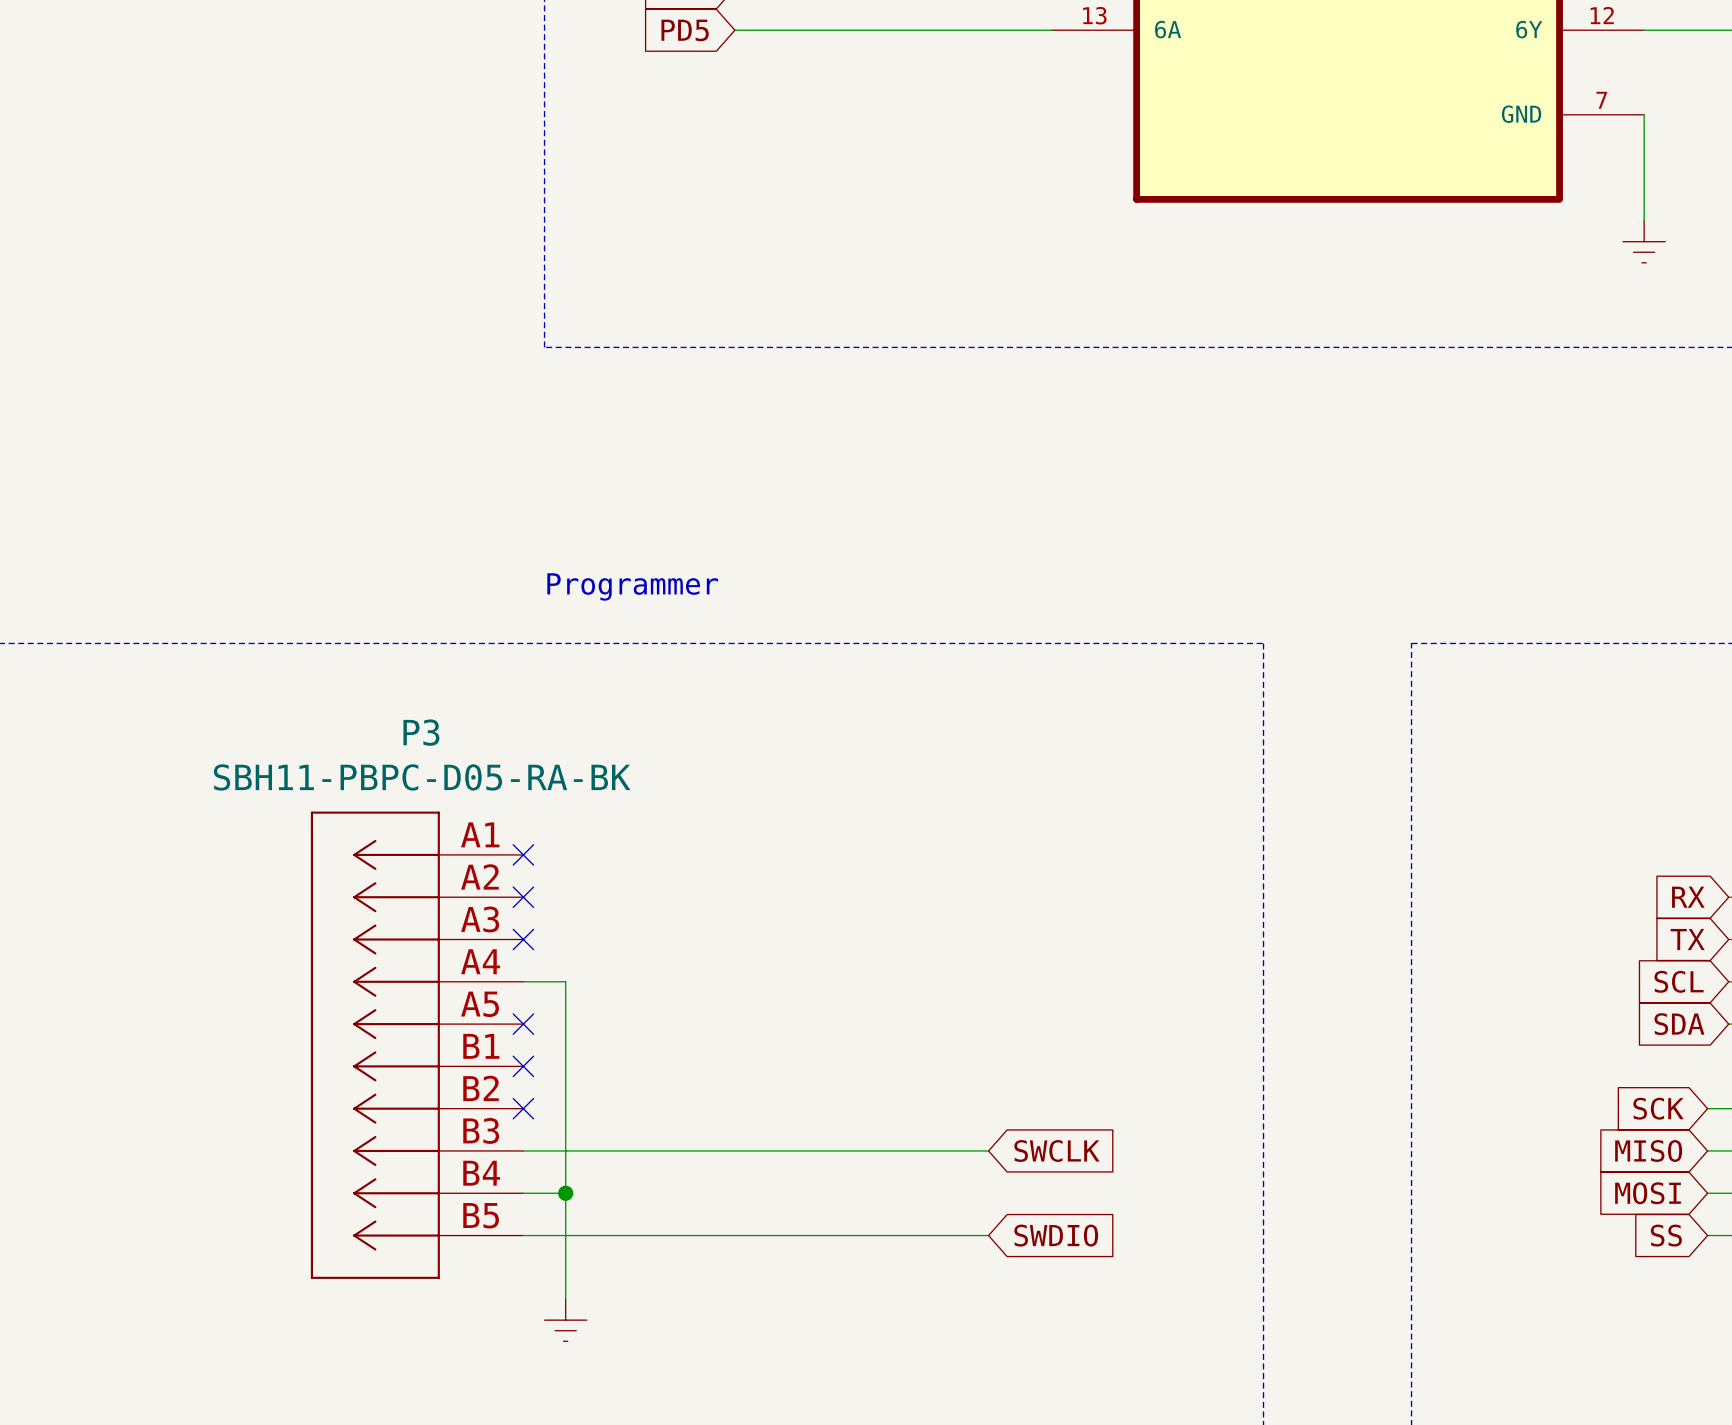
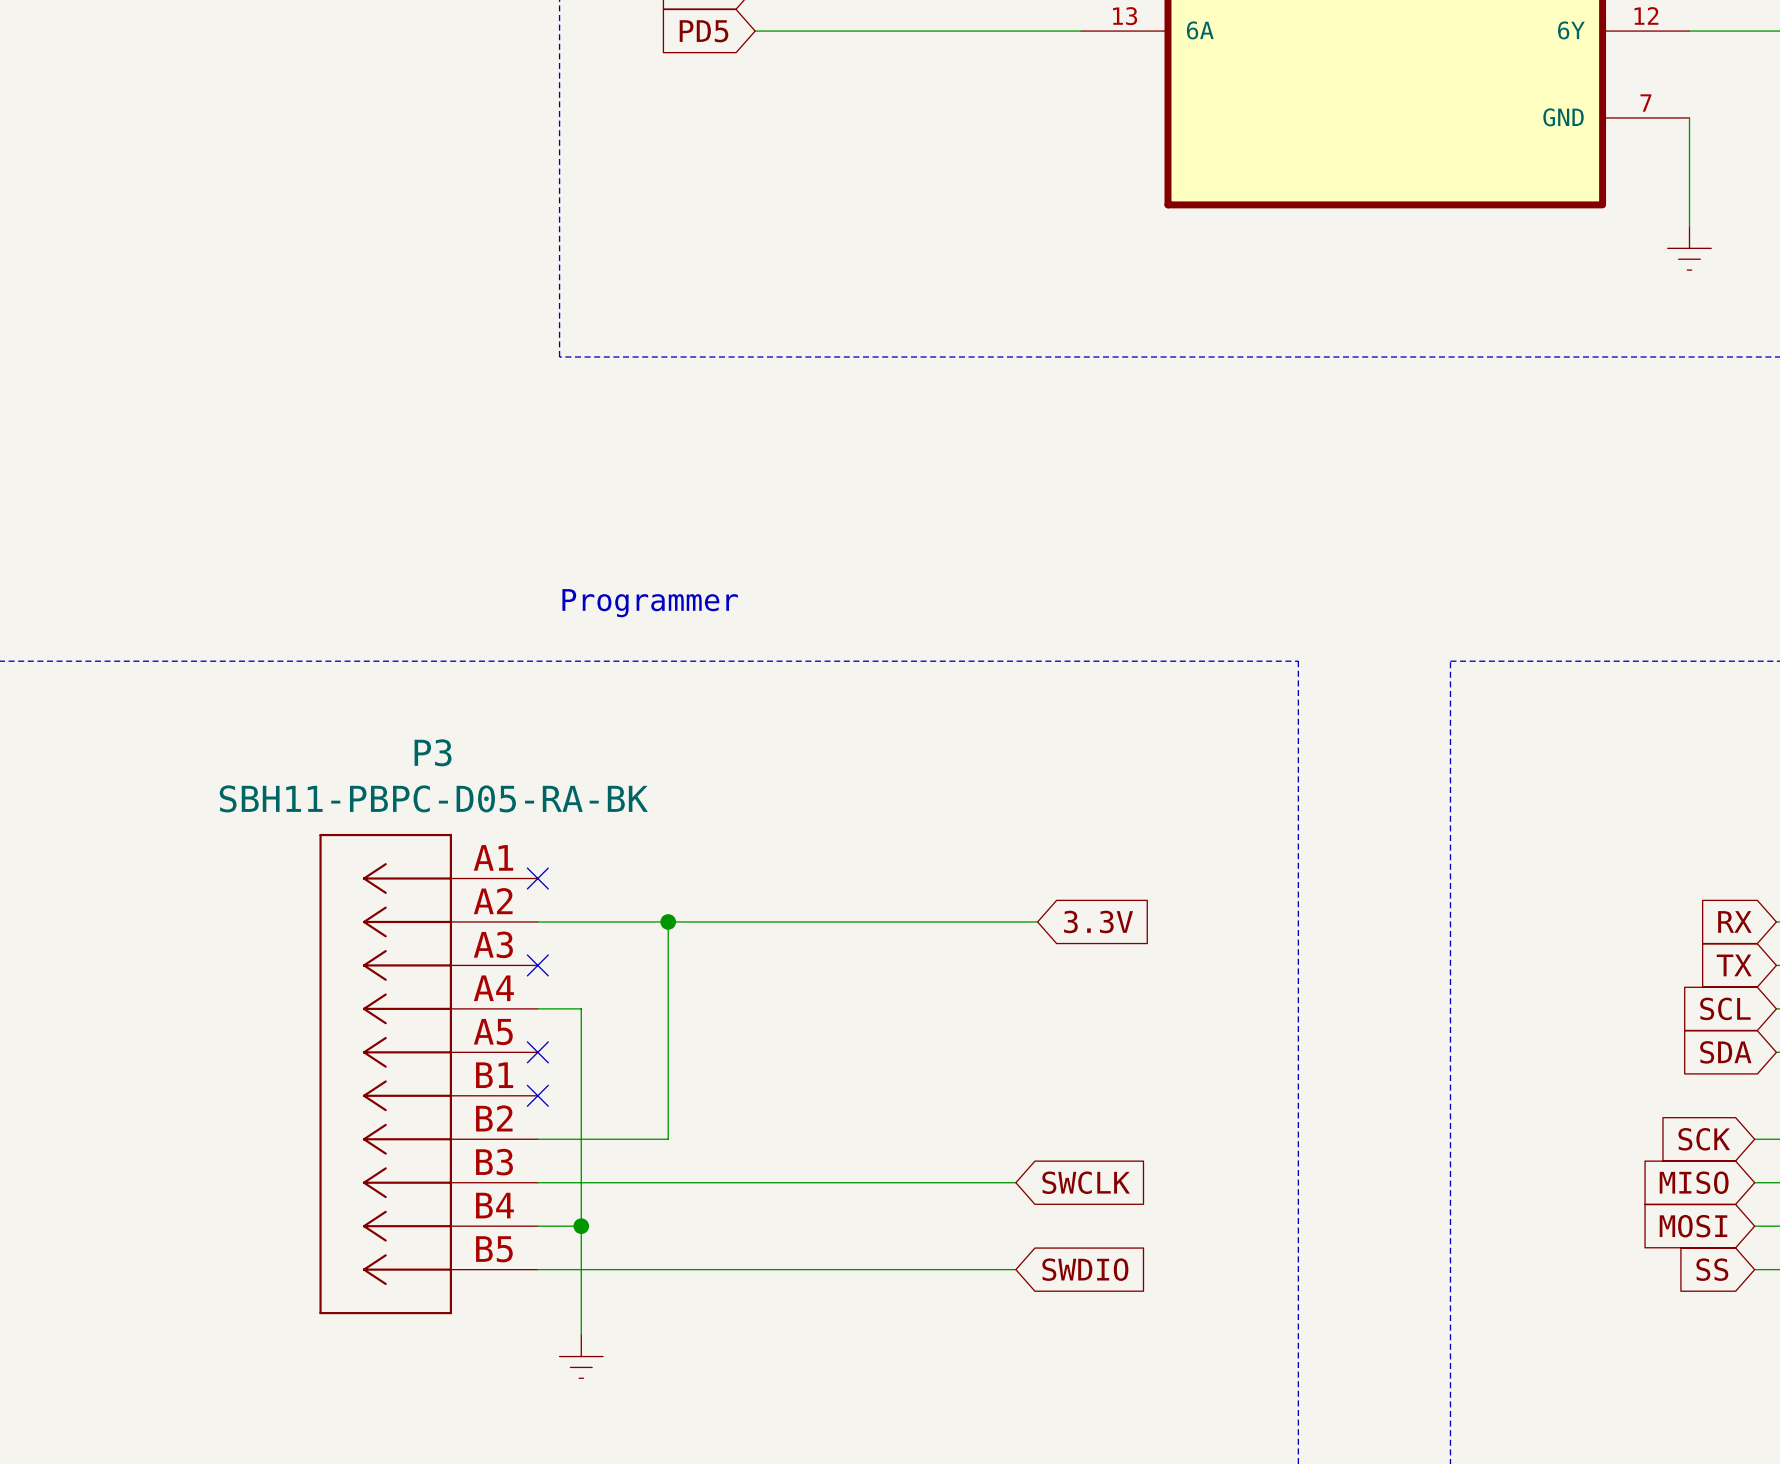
wire: none -> (537, 921) (1037, 921)
no-connect mark: (523, 897) -> none
wire: none -> (668, 921) (668, 1139) (537, 1139)
junction: none -> (668, 921)
global label: none -> 3.3V (1098, 921)
no-connect mark: (523, 1108) -> none

